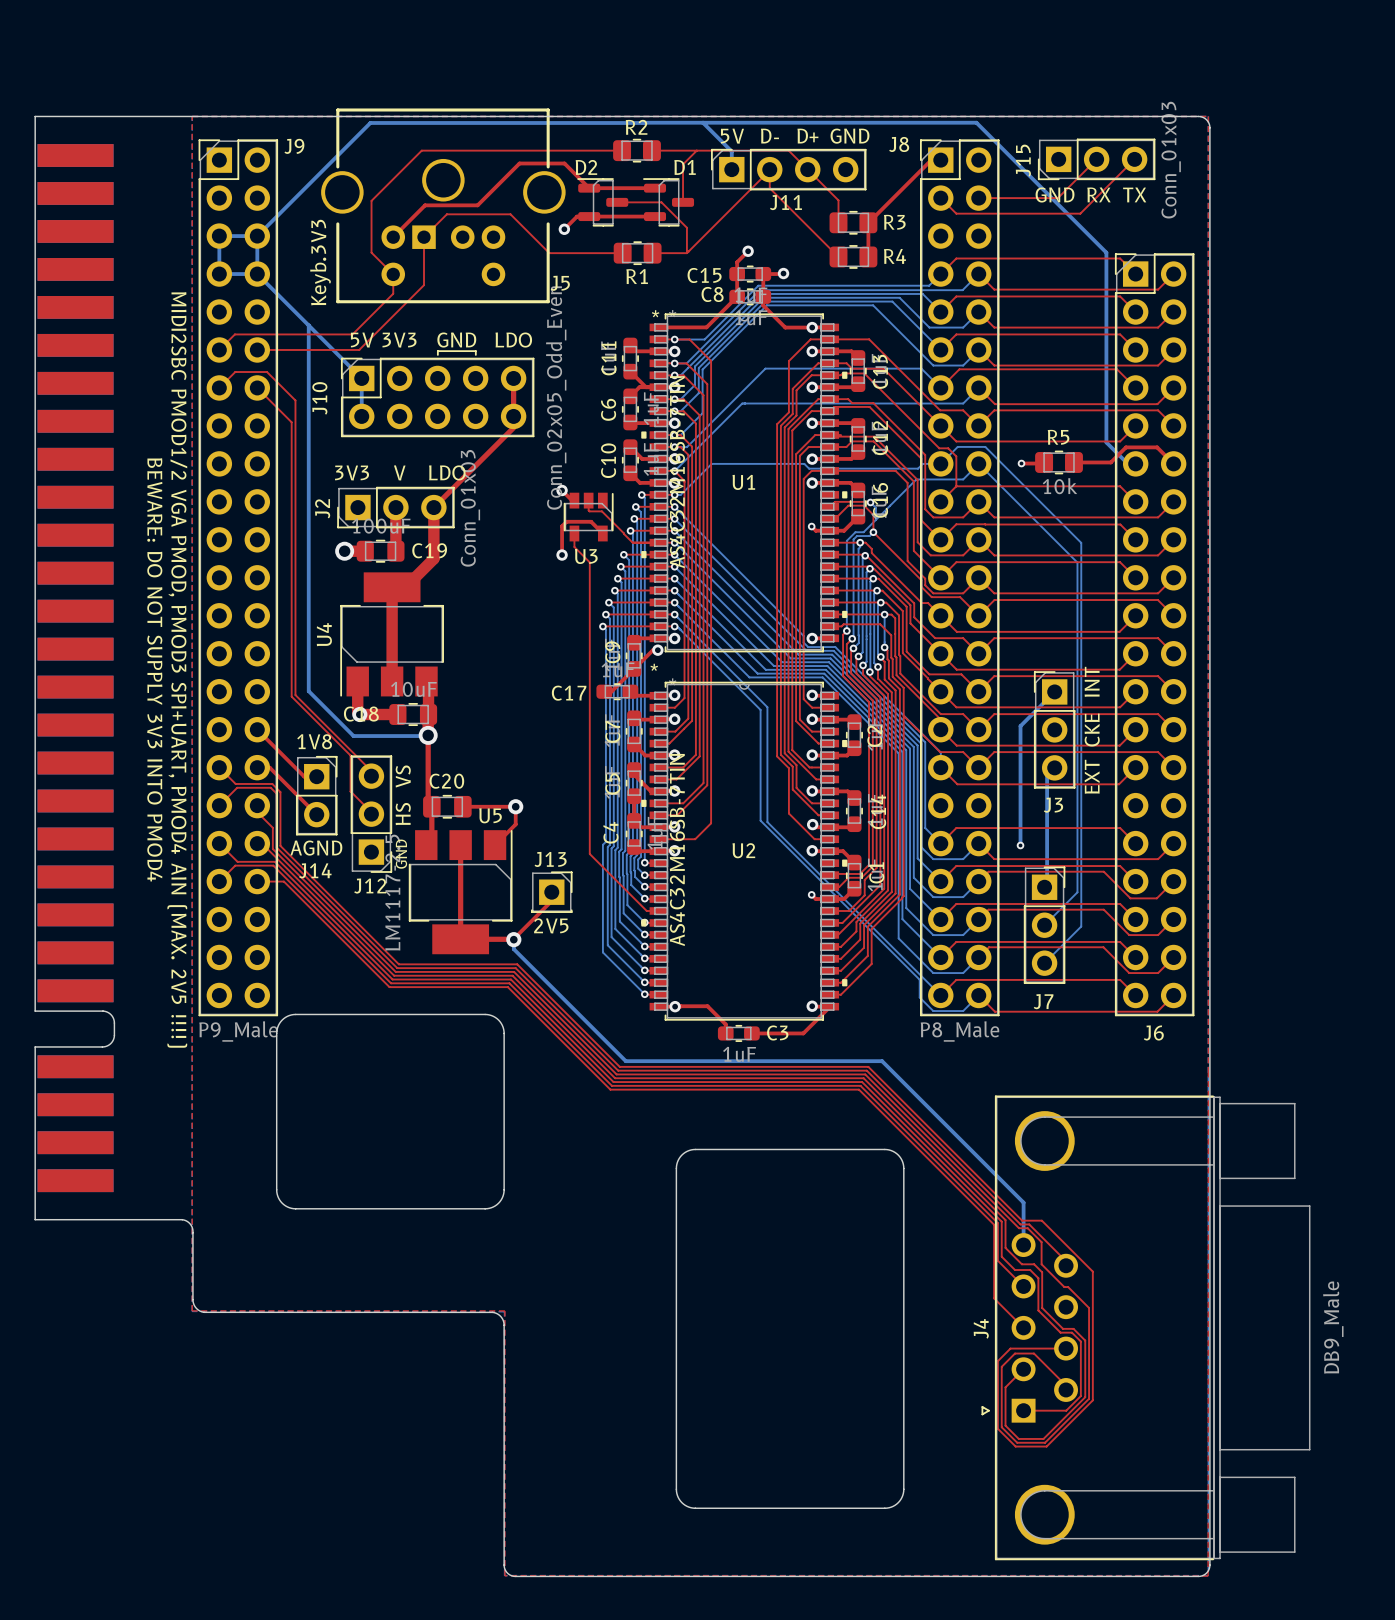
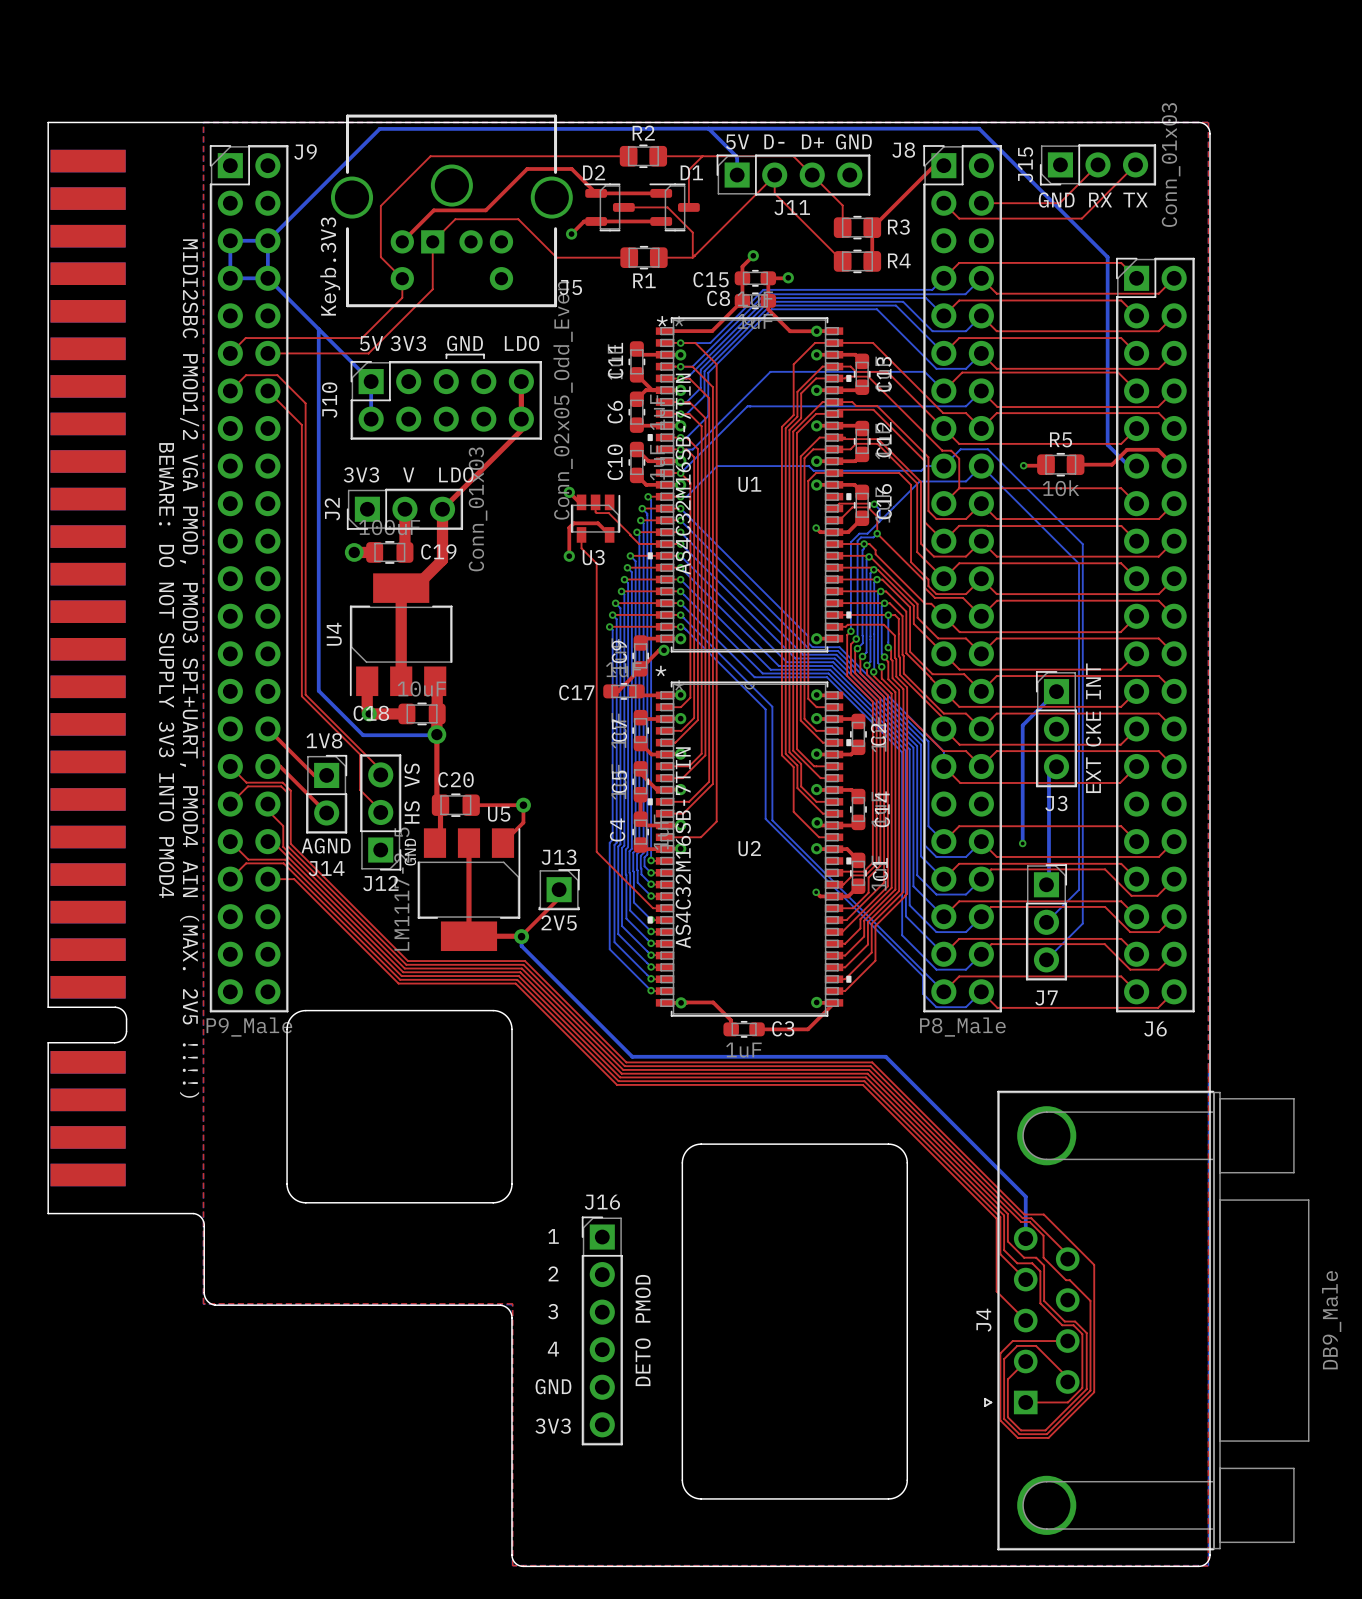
text: none -> 1 (553, 1236)
text: none -> 2 (553, 1273)
text: none -> 3 (553, 1311)
text: none -> DETO PMOD (643, 1330)
J16: none -> (602, 1330)
text: none -> 4 (553, 1349)
text: none -> GND (553, 1386)
text: none -> 3V3 (553, 1426)

